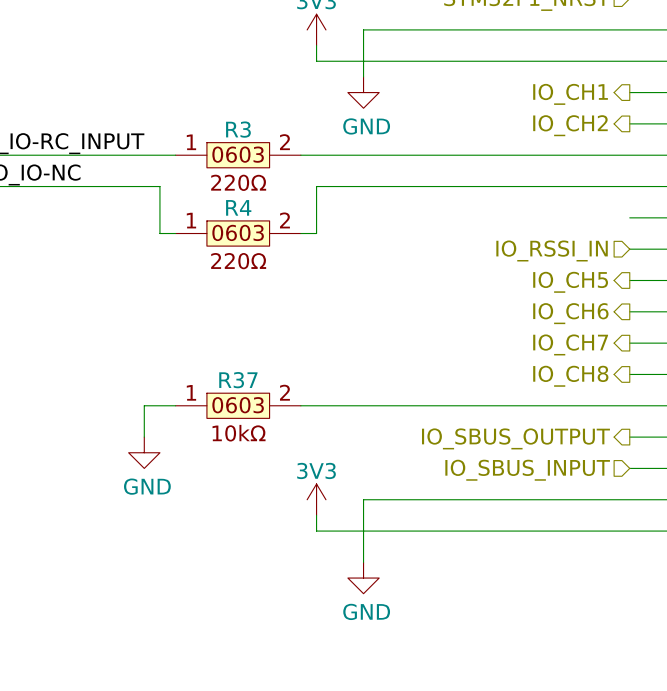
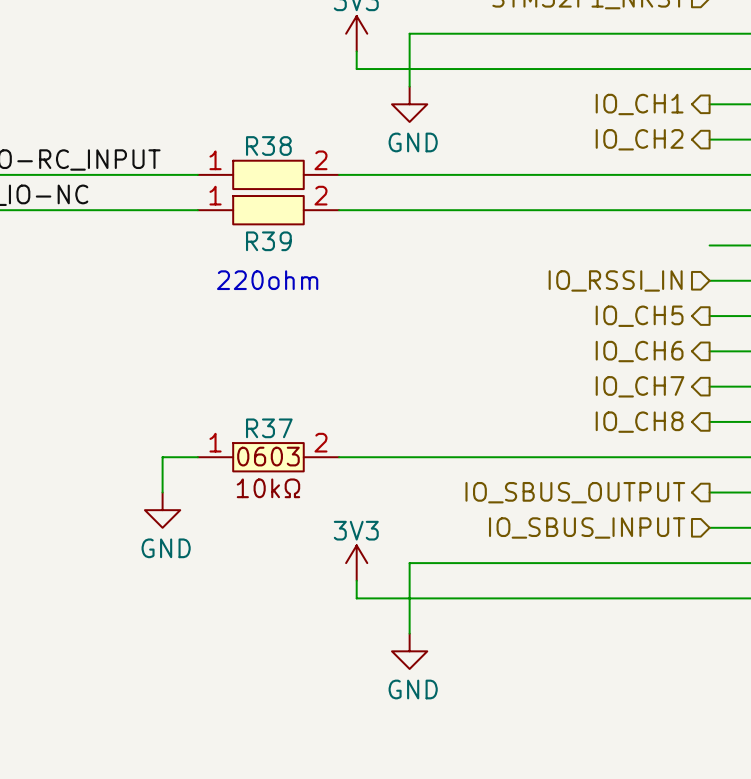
R3 name: R3 (238, 129) -> R38 (268, 146)
R3 text: 0603 (238, 154) -> none
R3 text: 220Ω (238, 182) -> none
wire: (159, 186) (159, 233) (175, 233) -> (180, 210) (197, 210)
R39: none -> (268, 210)
wire: (316, 186) (316, 233) (300, 233) -> (356, 210) (339, 210)
R4: (238, 233) -> none
text: none -> 220ohm (267, 280)

